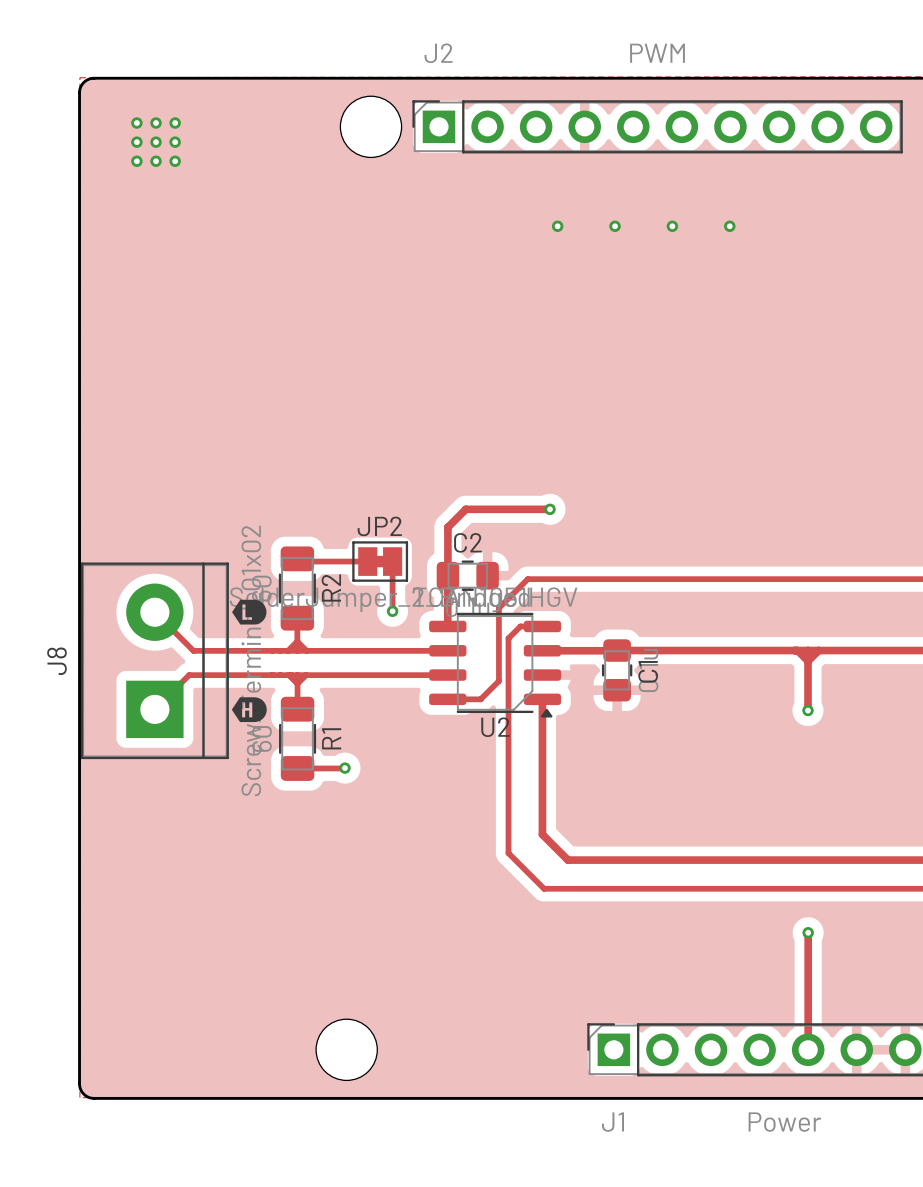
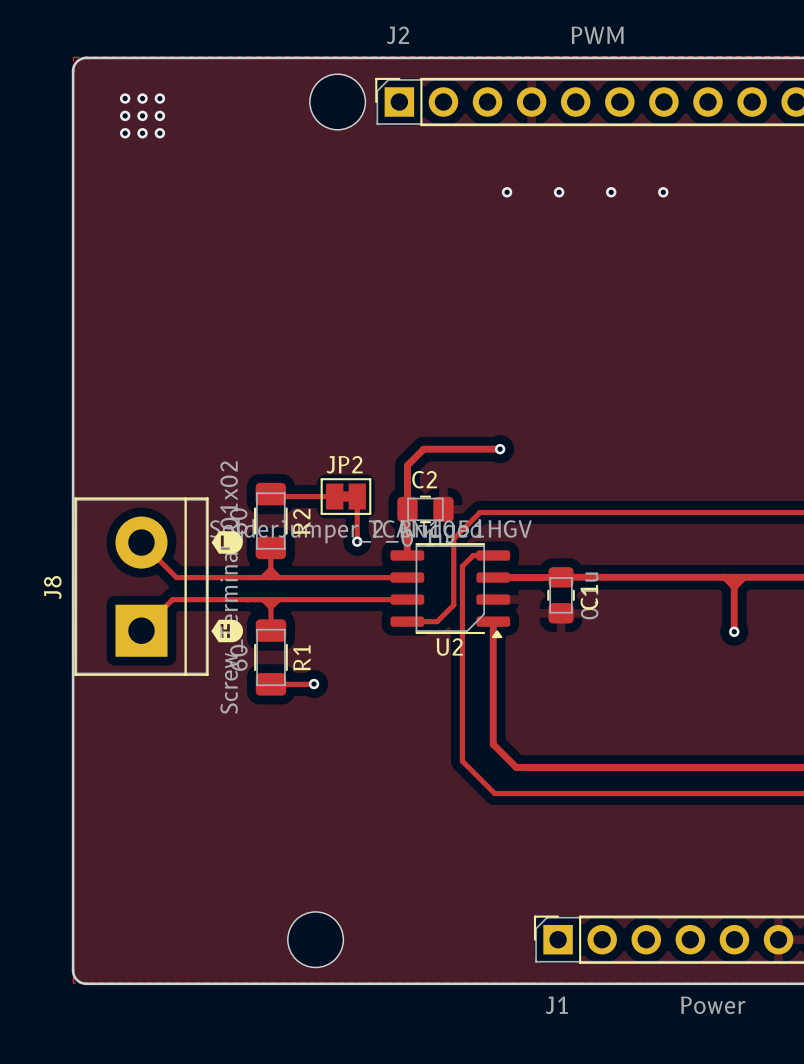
track: (808, 932) (808, 1049) -> none
via: (808, 932) -> none

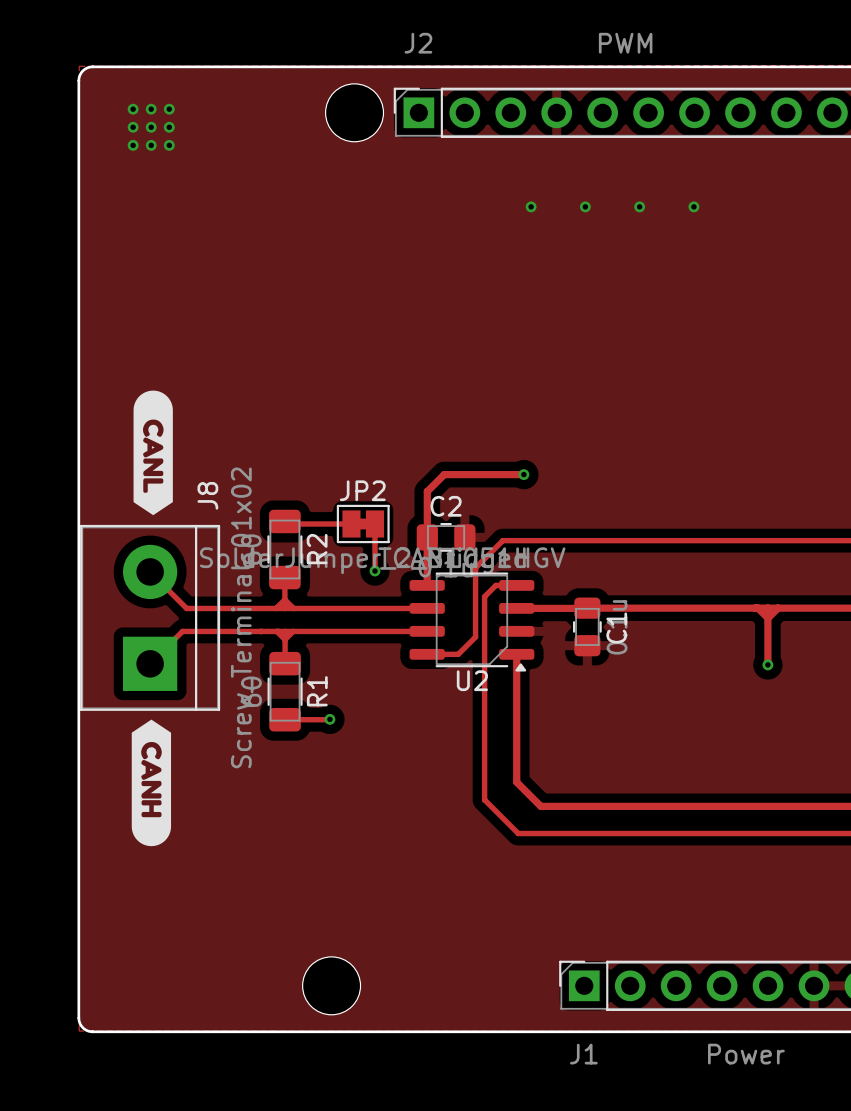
drawing: none -> [133, 390, 173, 516]
drawing: [211, 531, 243, 554] -> none
J8 name position: J8 (52, 587) -> J8 (207, 495)
drawing: [211, 619, 243, 643] -> none
drawing: none -> [131, 719, 172, 847]

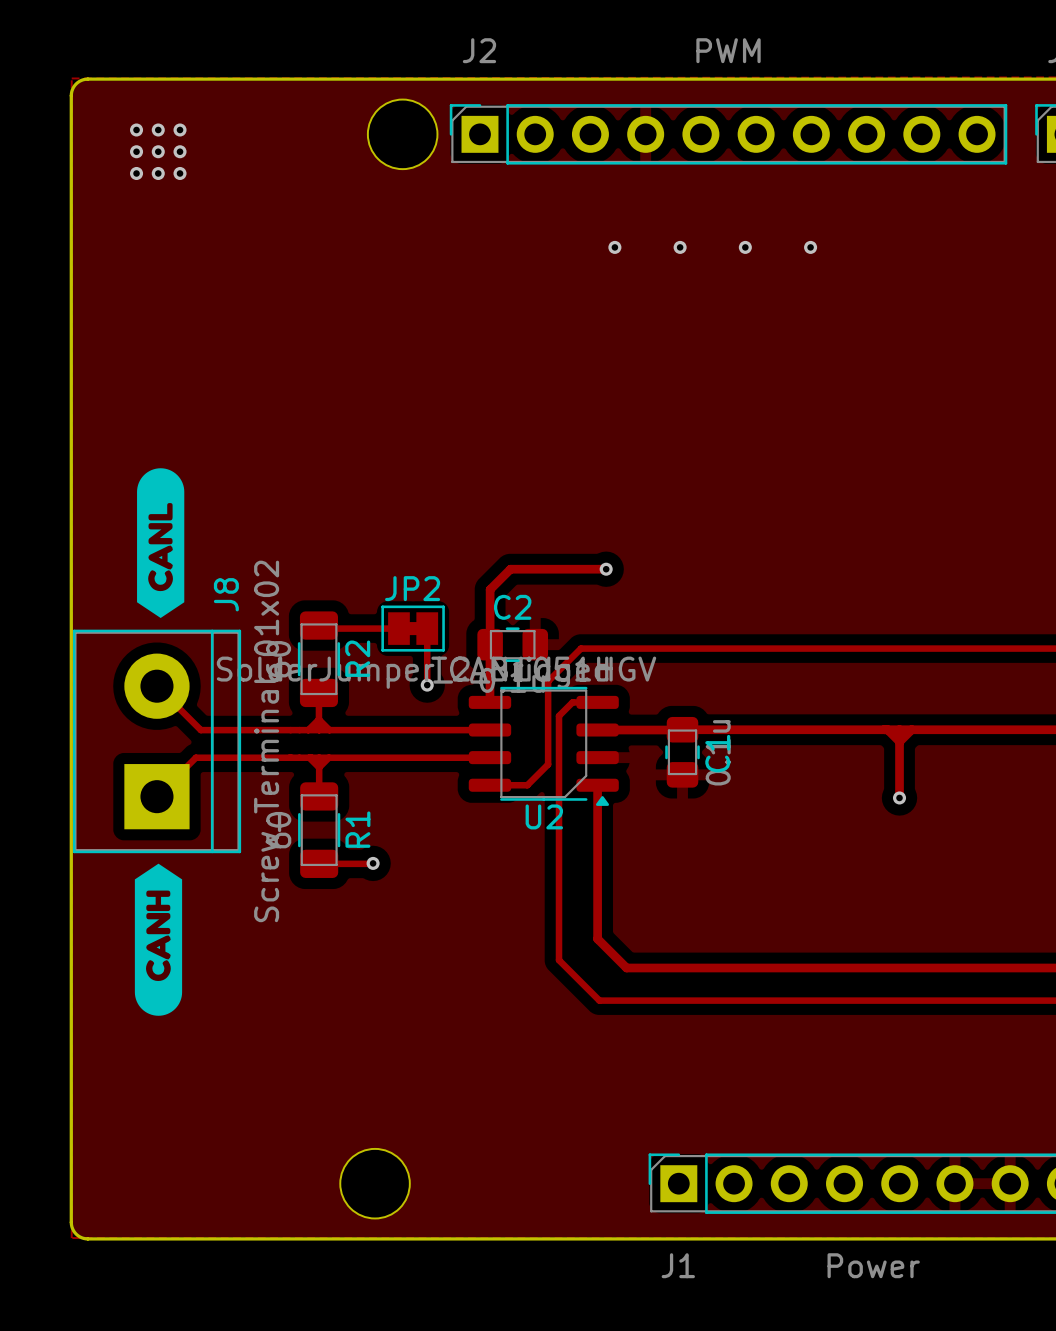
drawing shape: [133, 390, 173, 516] -> [137, 468, 185, 619]
drawing shape: [131, 719, 172, 847] -> [134, 863, 183, 1016]

